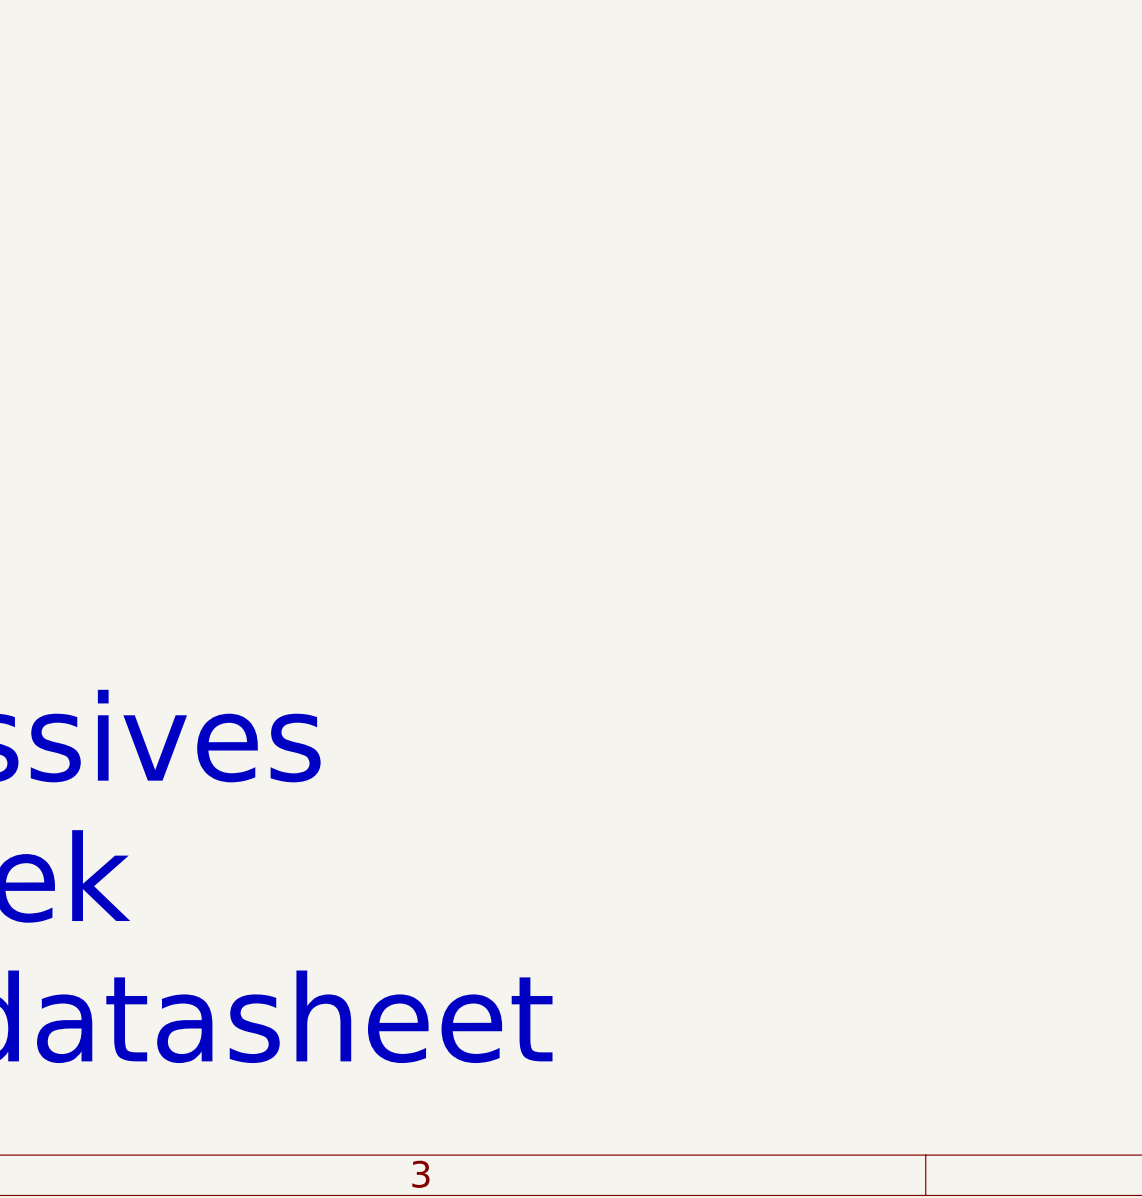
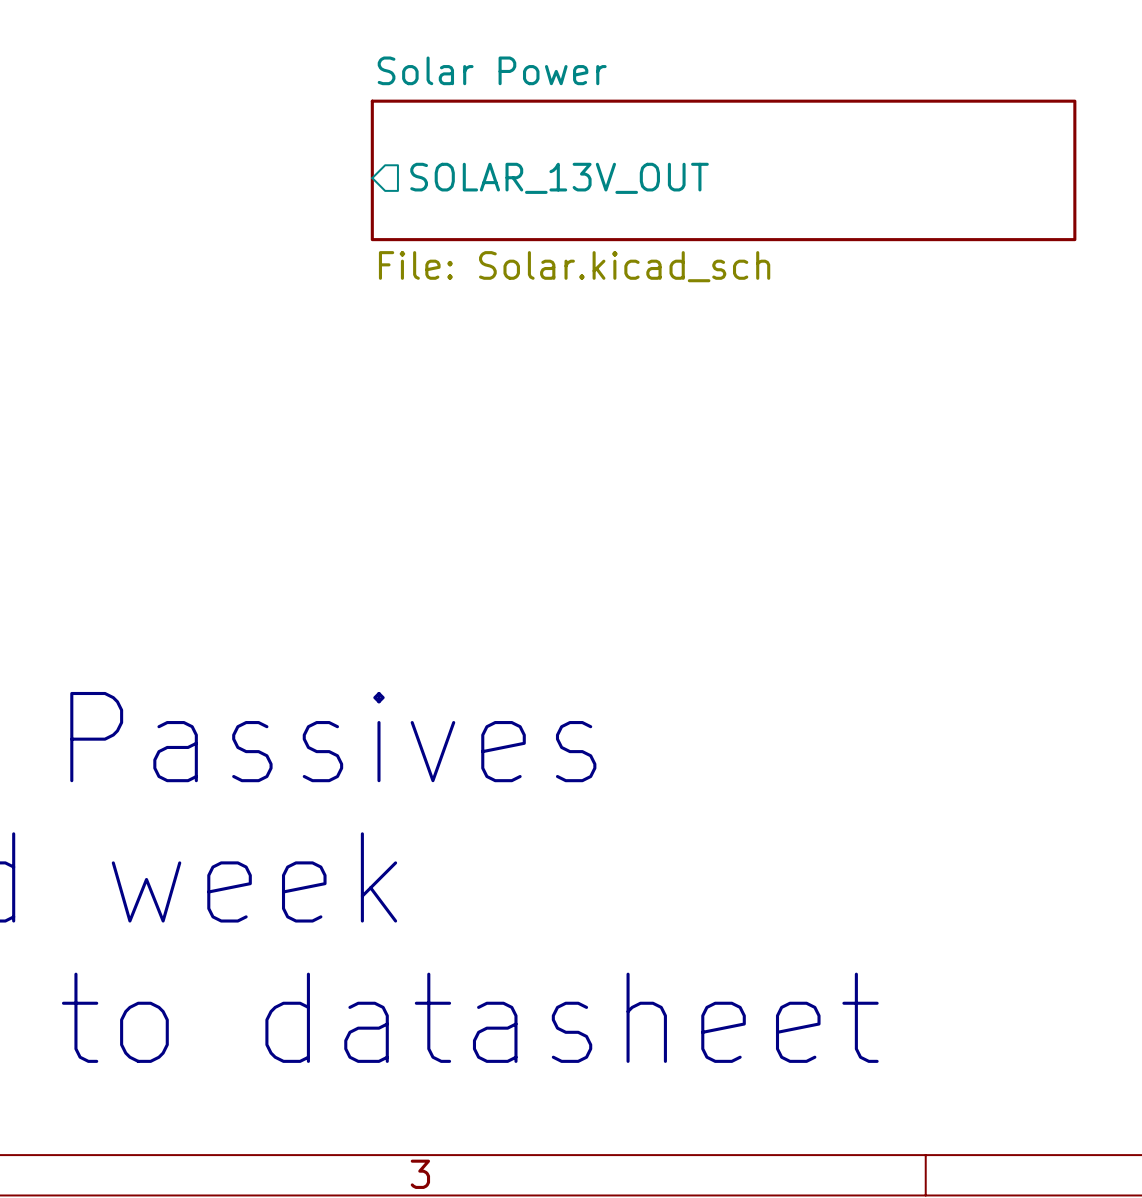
sheet Solar Power: none -> File: Solar.kicad_sch (723, 170)
sheet pin: none -> SOLAR_13V_OUT (559, 178)

